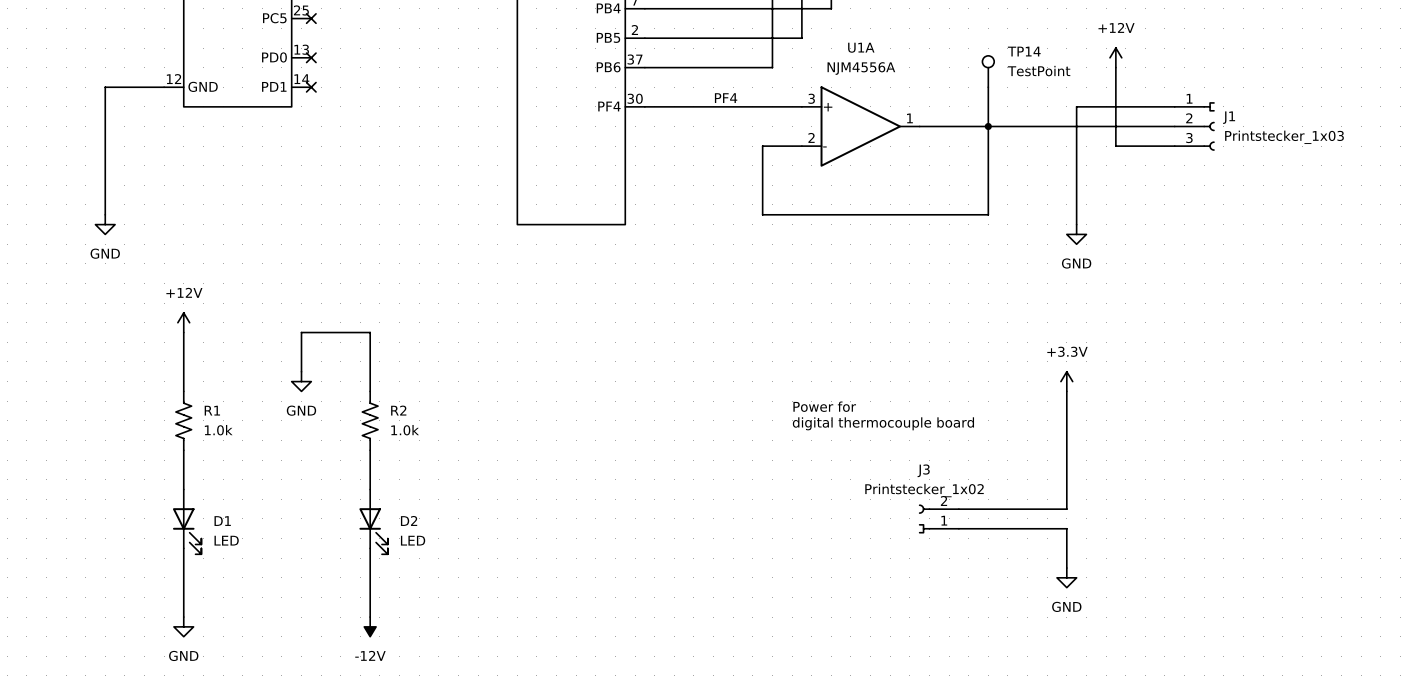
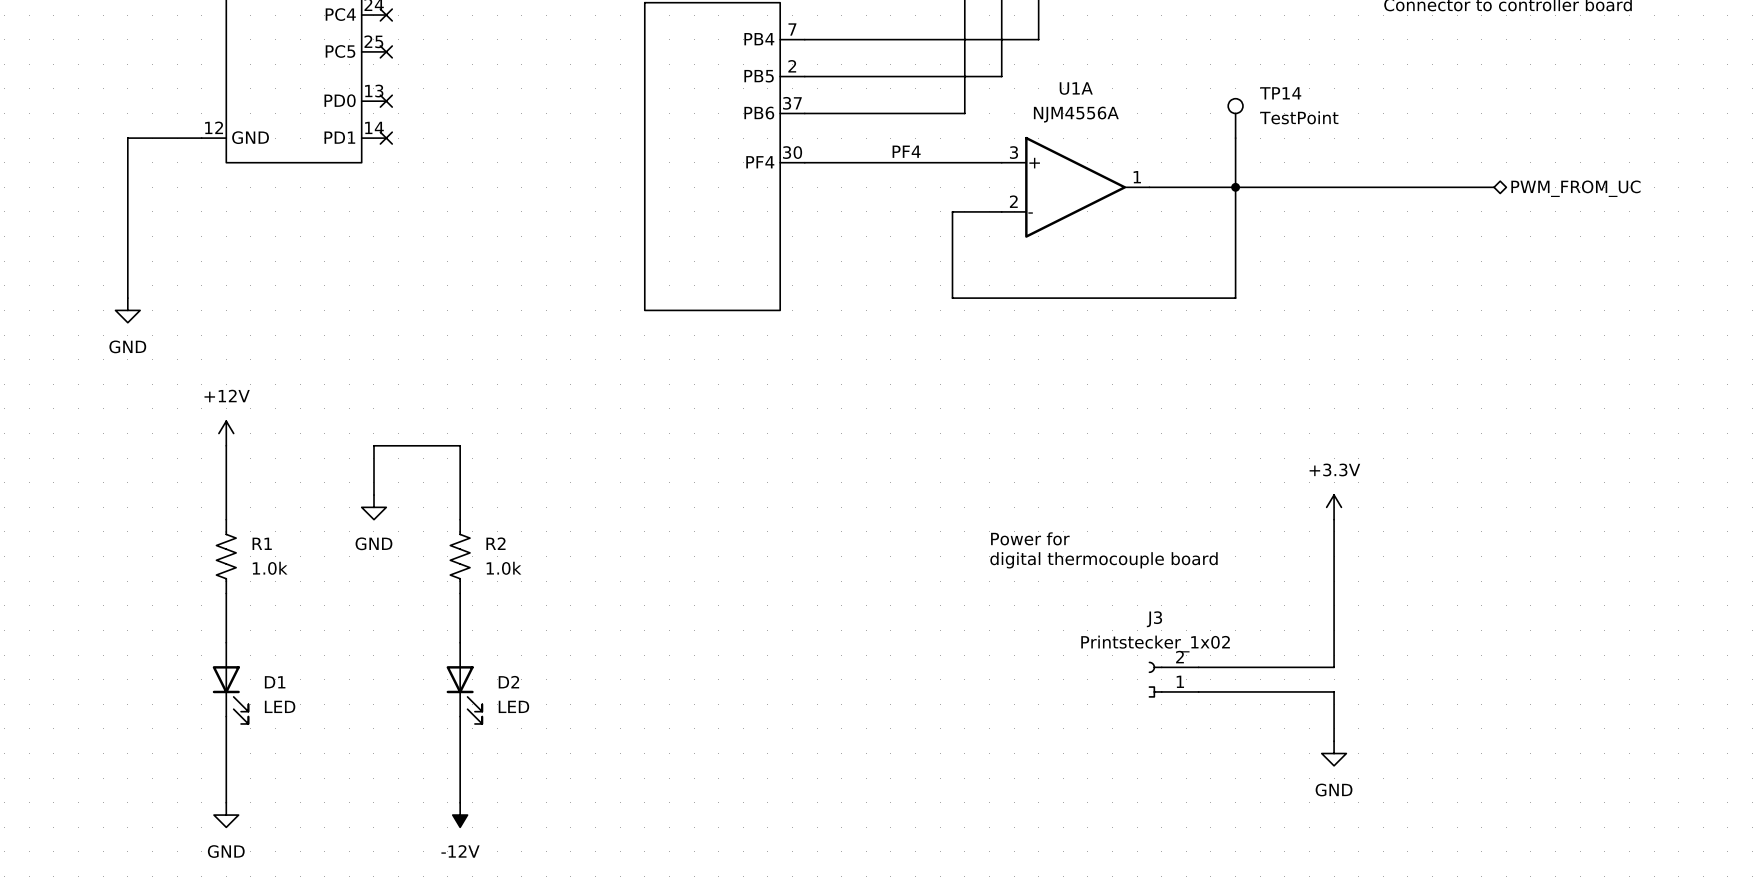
power symbol: +12V (1115, 57) -> none
wire: (1115, 67) (1115, 146) (1174, 146) -> none
wire: (1174, 106) (1076, 106) (1076, 224) -> none
J1: Printstecker_1x03 (1194, 126) -> none
hierarchical label: none -> PWM_FROM_UC (1575, 188)
power symbol: GND (1076, 234) -> none

